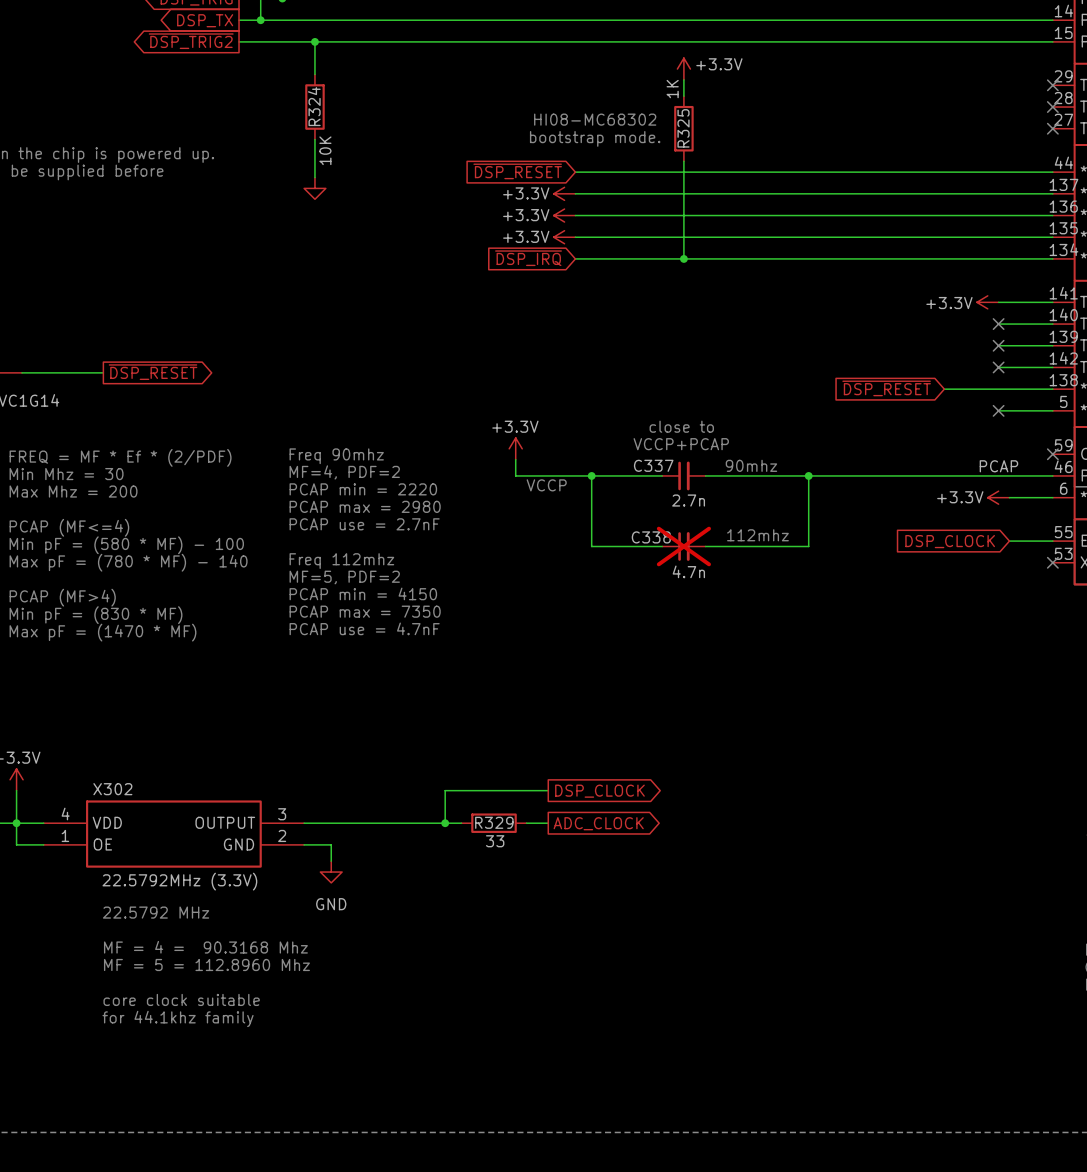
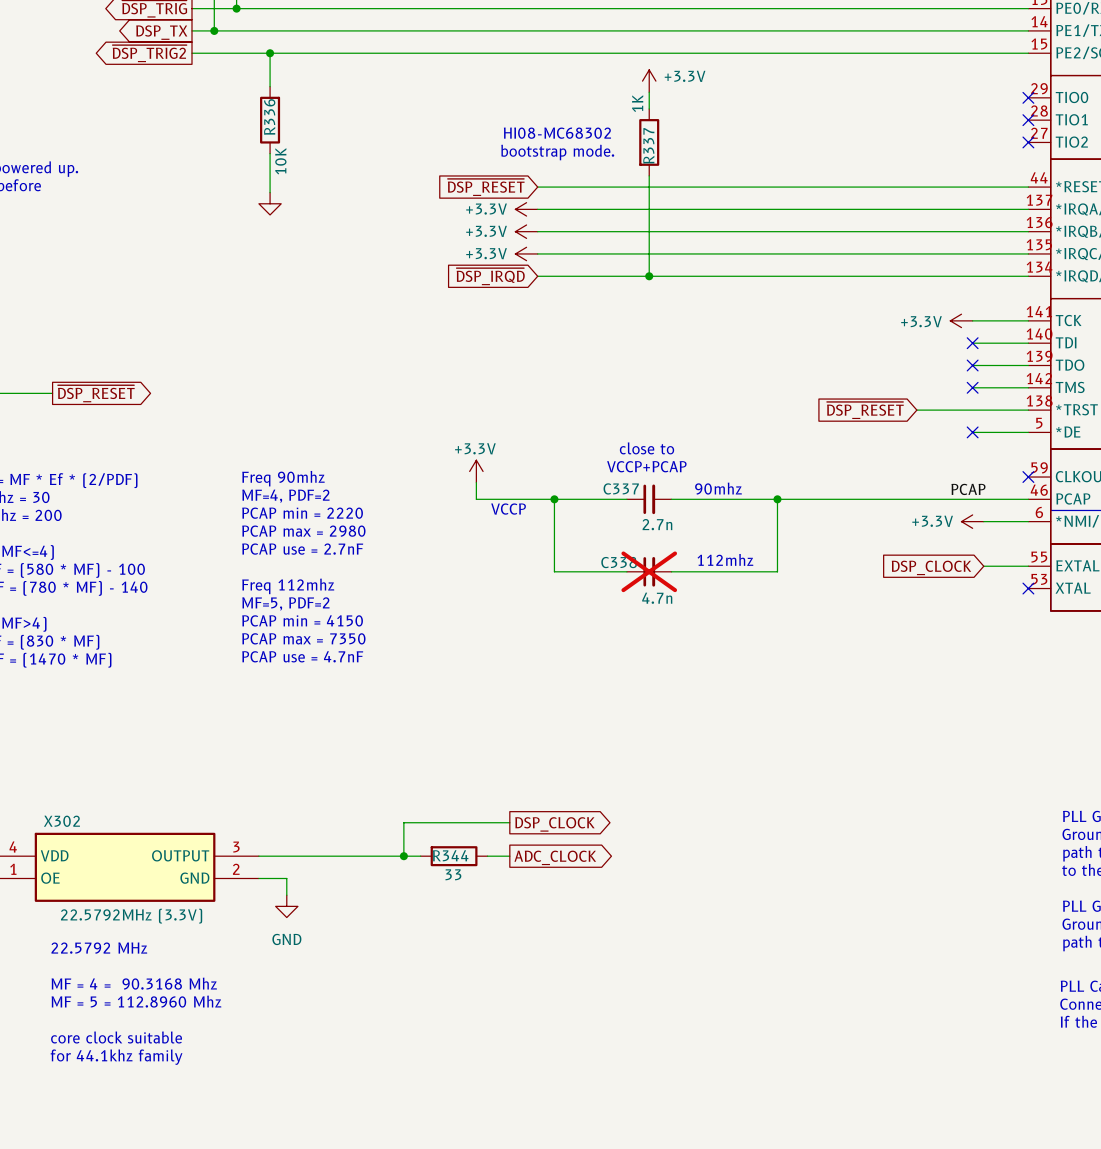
R324 name: R324 (314, 106) -> R336 (269, 116)
R325 name: R325 (683, 128) -> R337 (648, 145)
global label: ~{DSP_IRQ} (528, 258) -> ~{DSP_IRQD} (490, 276)
R329 name: R329 (494, 822) -> R344 (450, 855)

